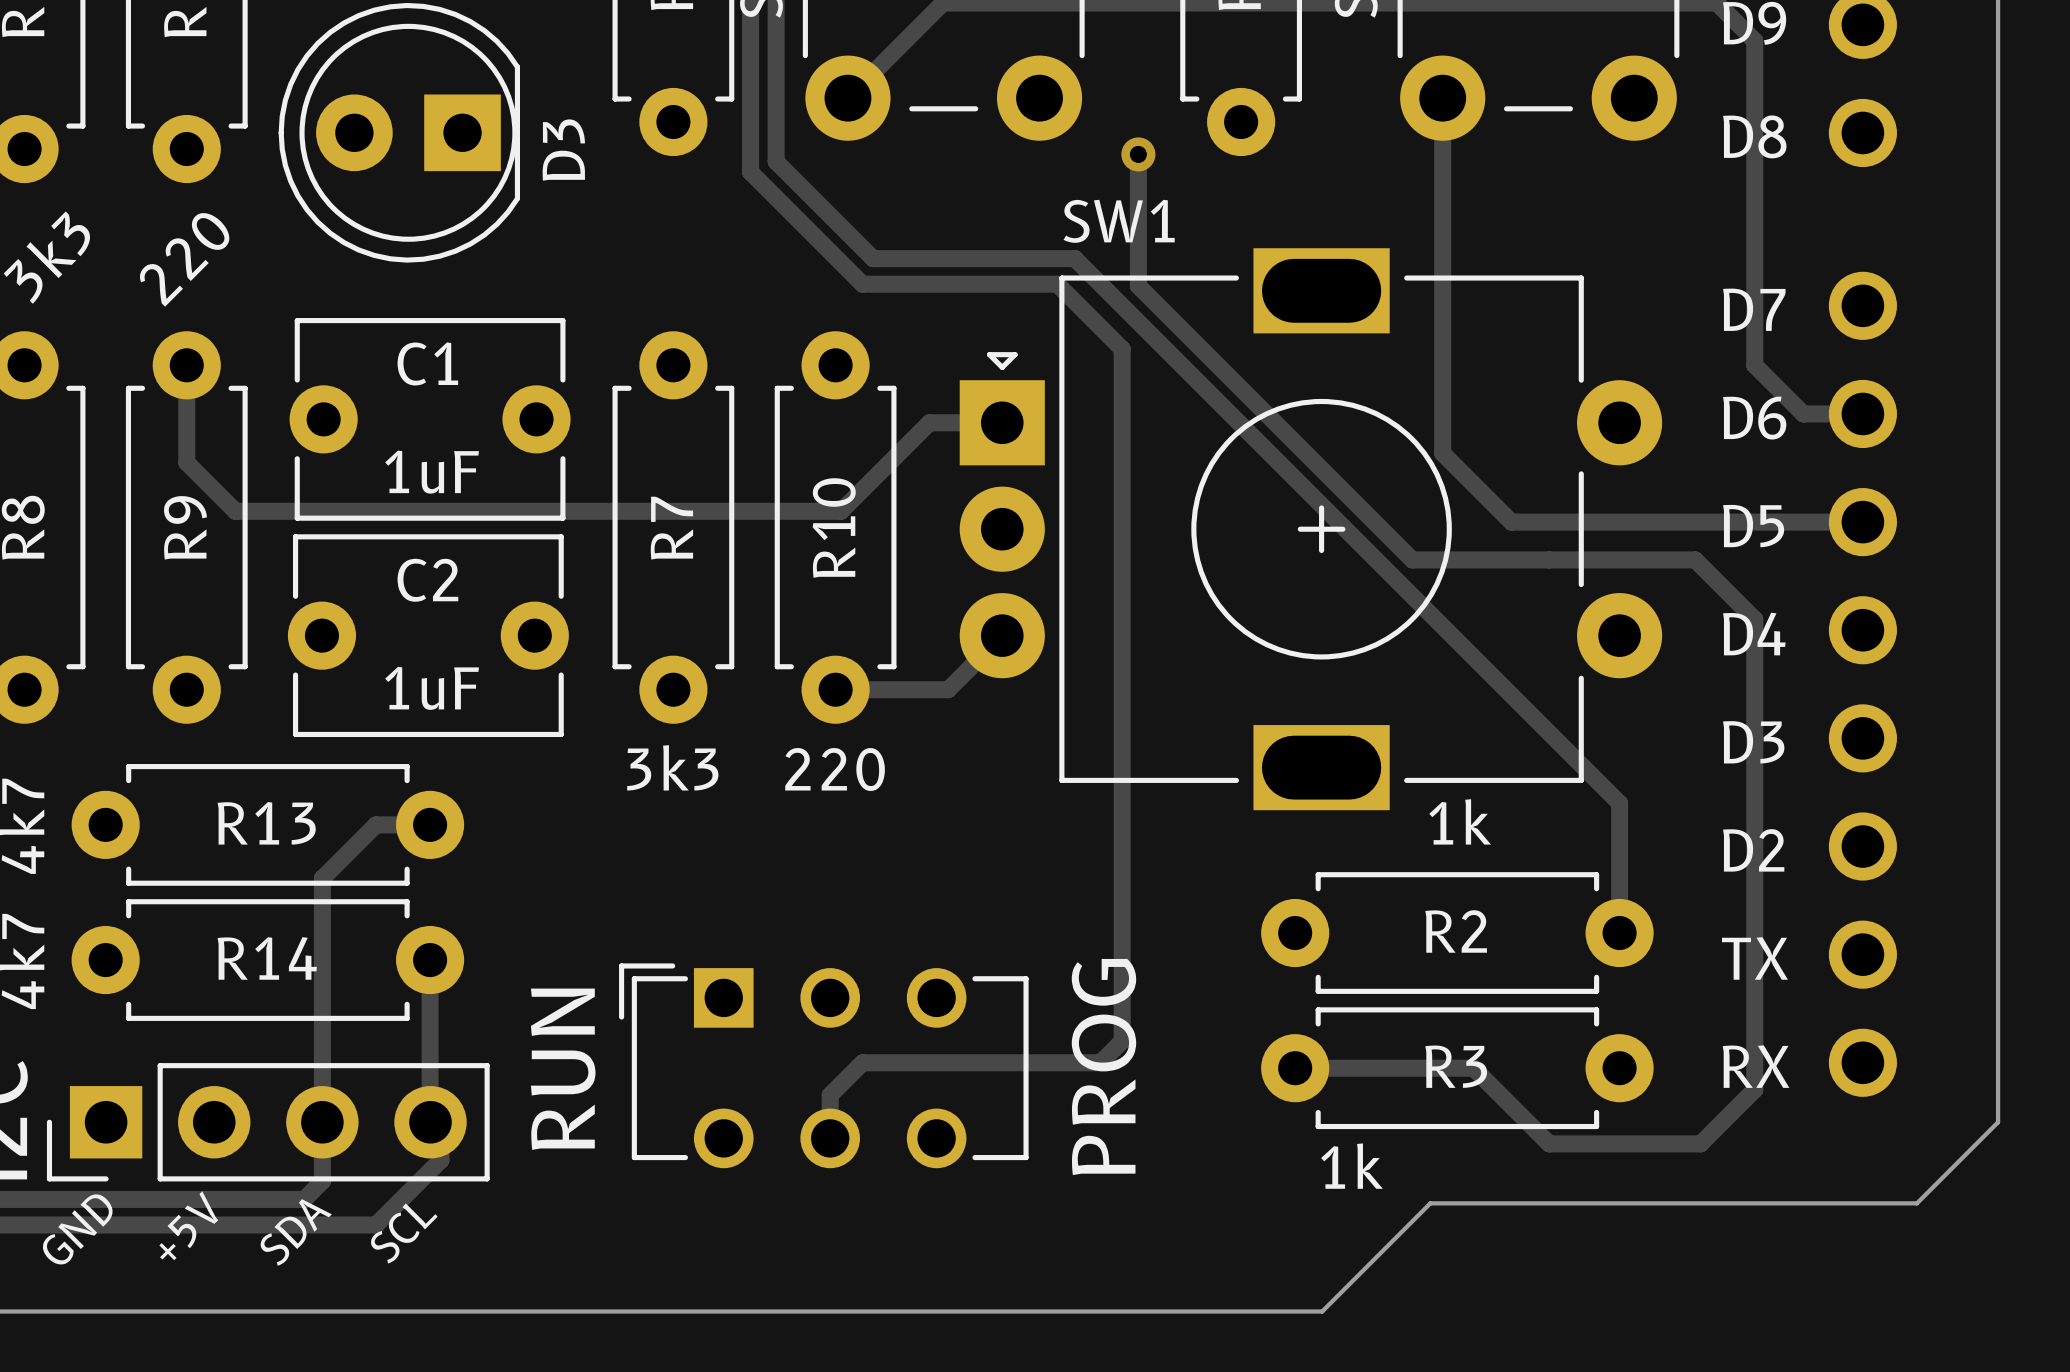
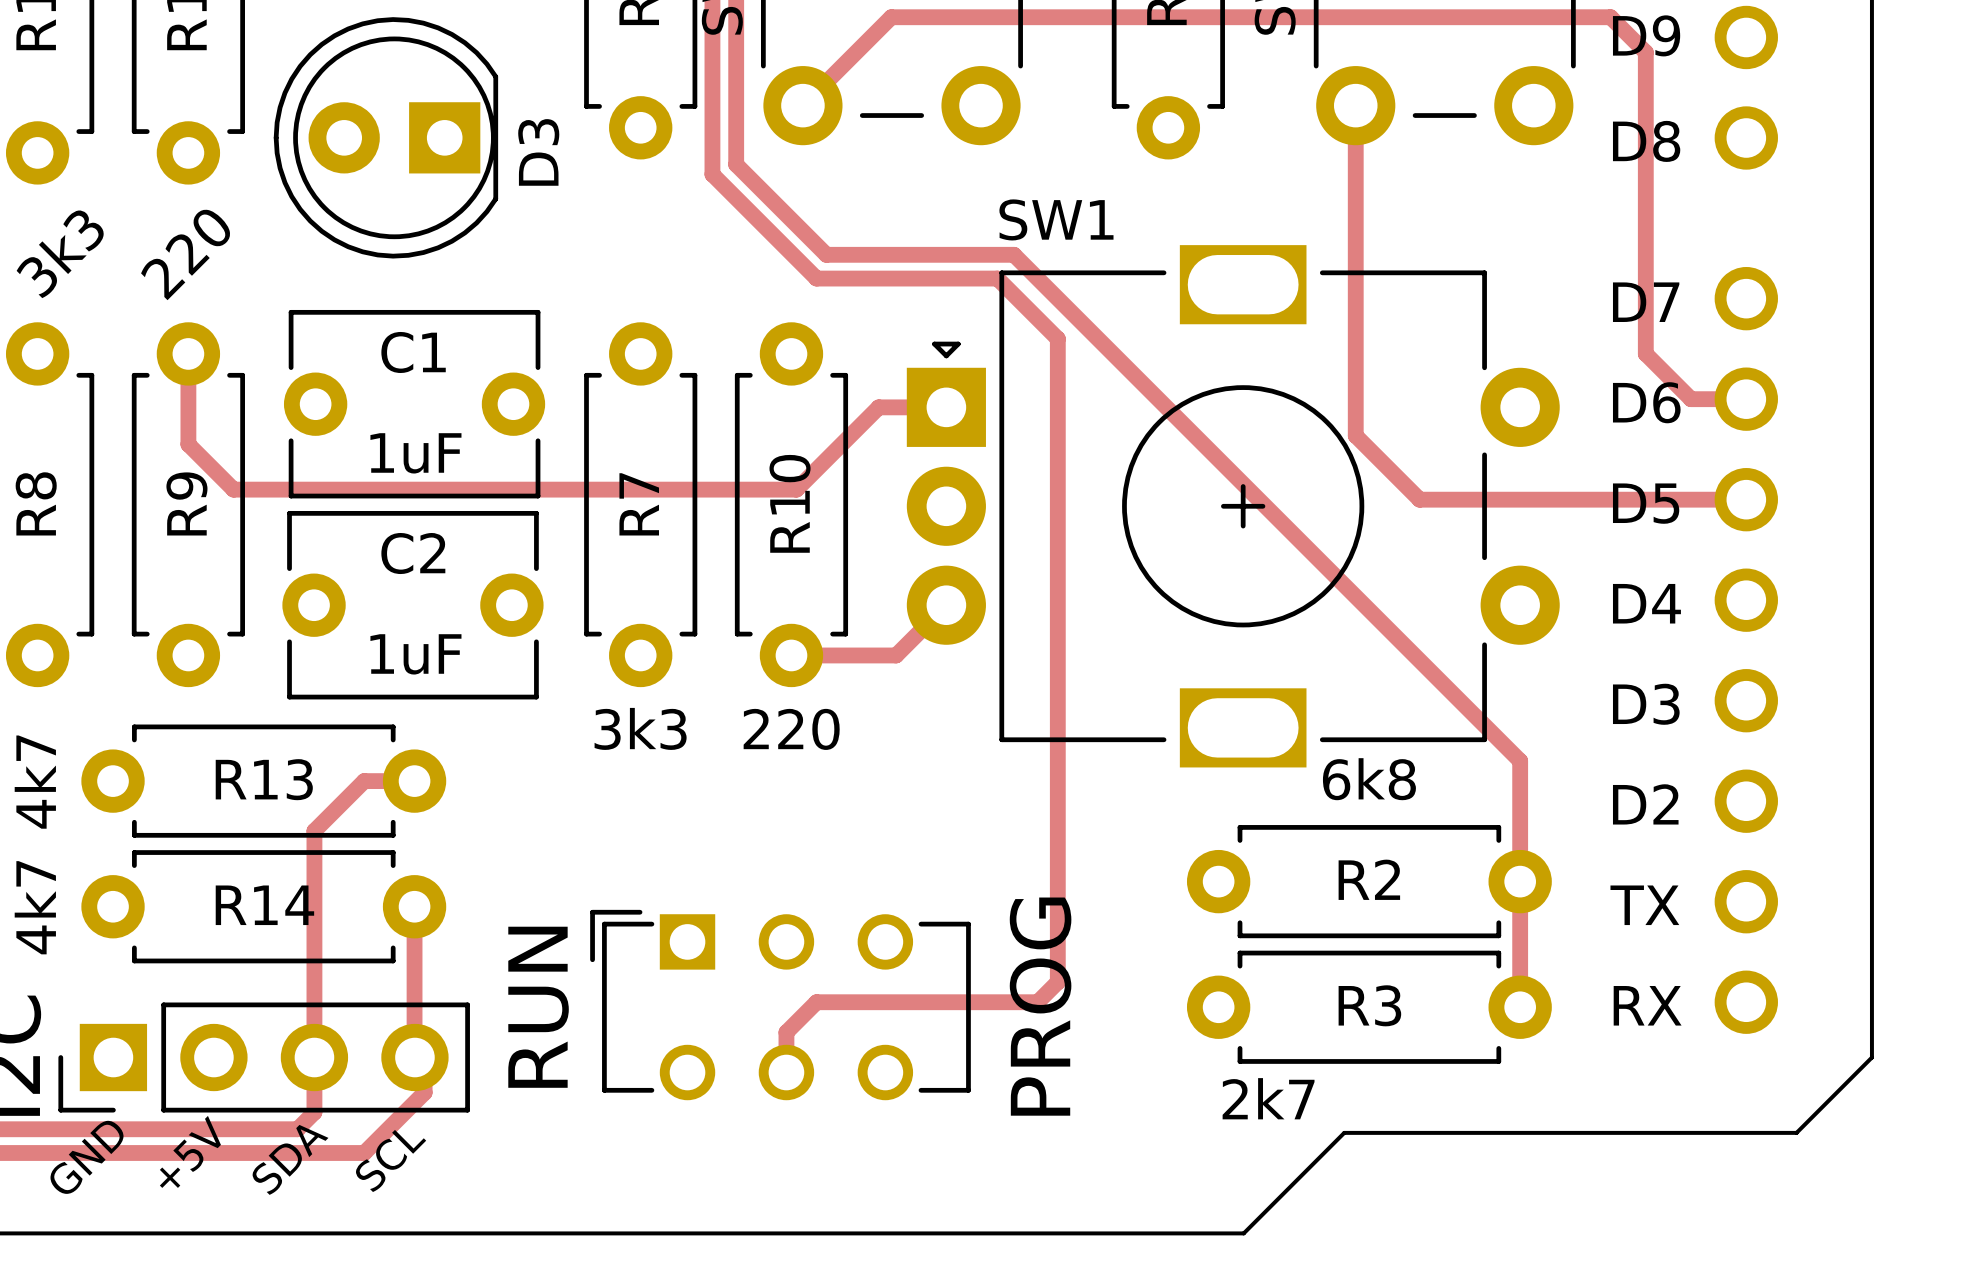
track: (1138, 154) (1138, 285) (1412, 559) (1695, 559) (1754, 619) (1754, 1089) (1700, 1143) (1549, 1143) (1473, 1068) (1295, 1068) -> none
via: (1138, 154) -> none
R2 value: 1k (1460, 821) -> 6k8 (1369, 779)
track: none -> (1520, 881) (1520, 1007)
R3 value: 1k (1352, 1166) -> 2k7 (1268, 1098)

